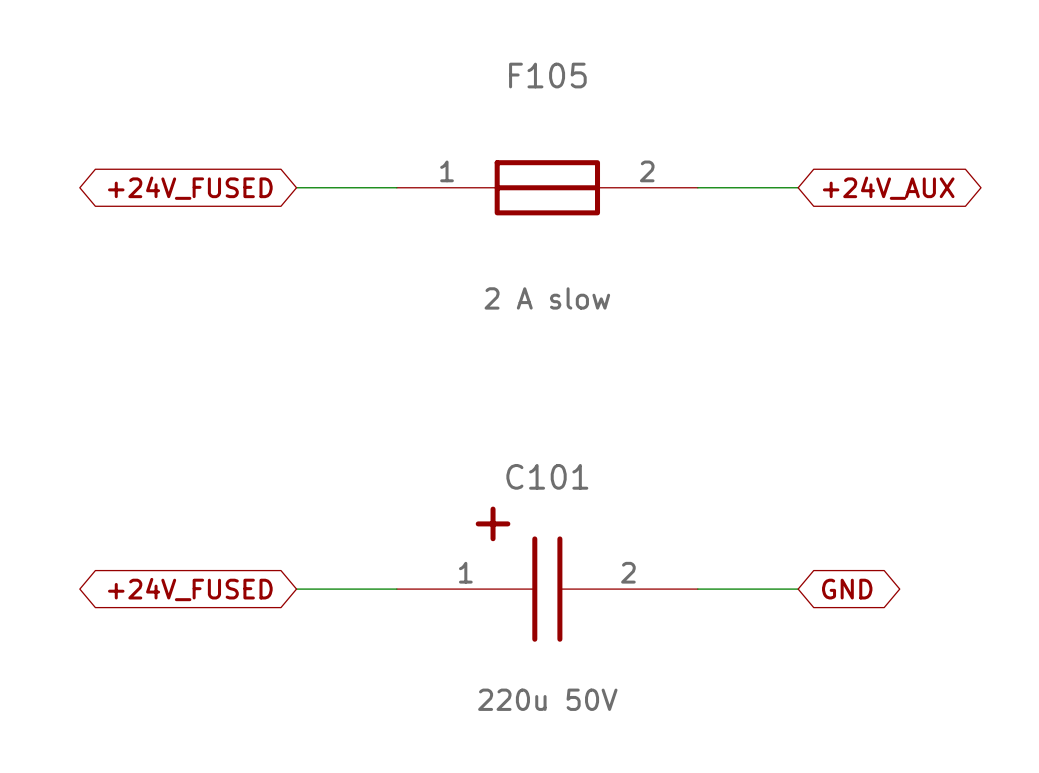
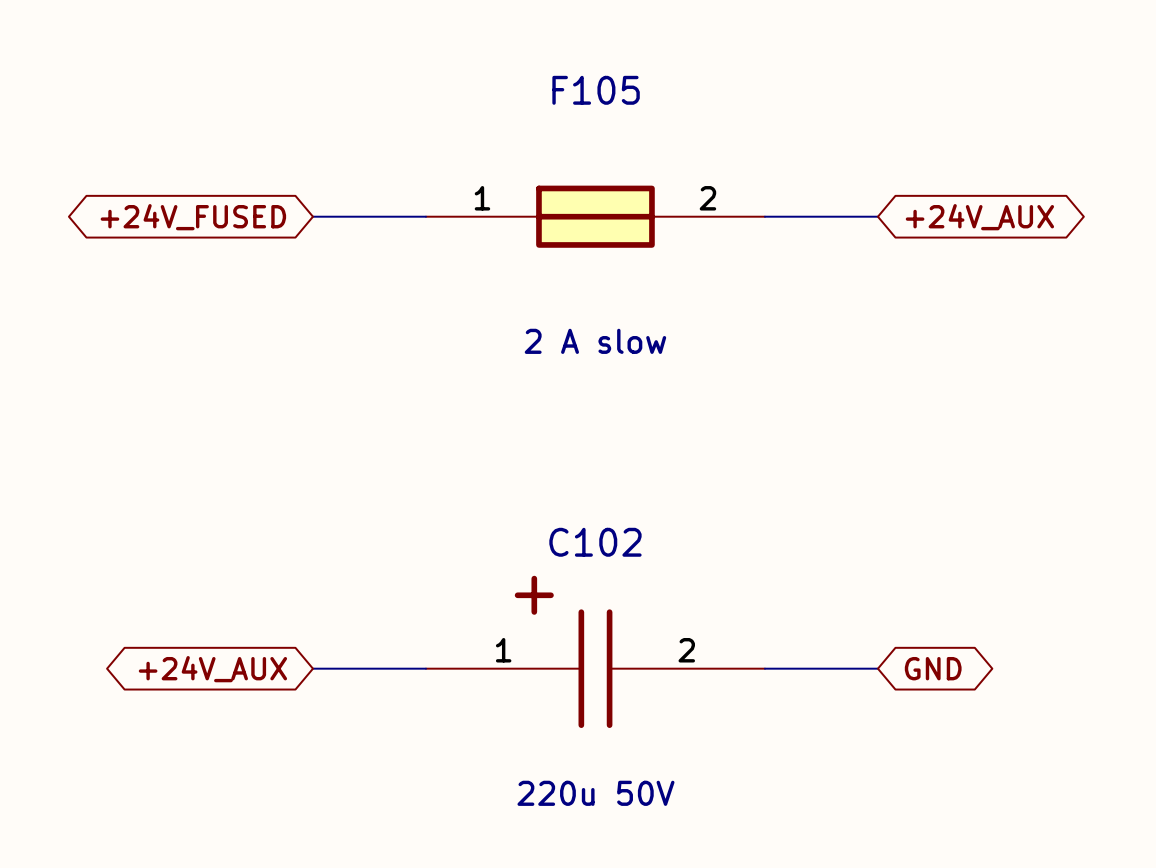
C101 name: C101 (547, 476) -> C102 (595, 542)
global label: +24V_FUSED (190, 589) -> +24V_AUX (212, 669)

